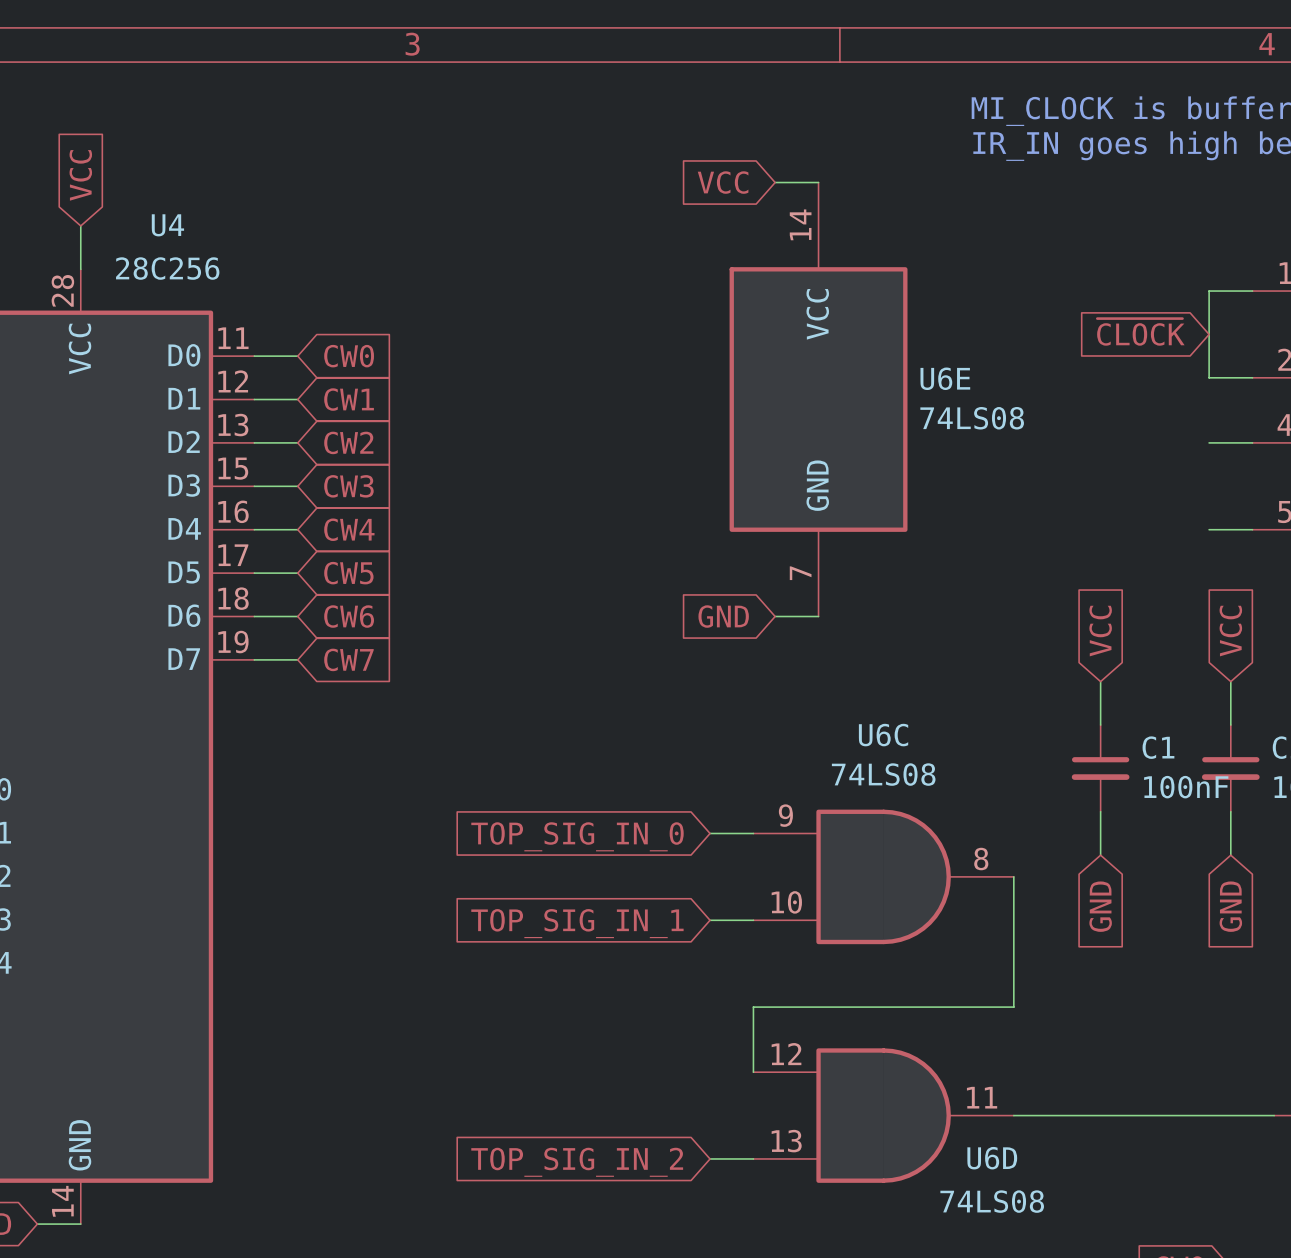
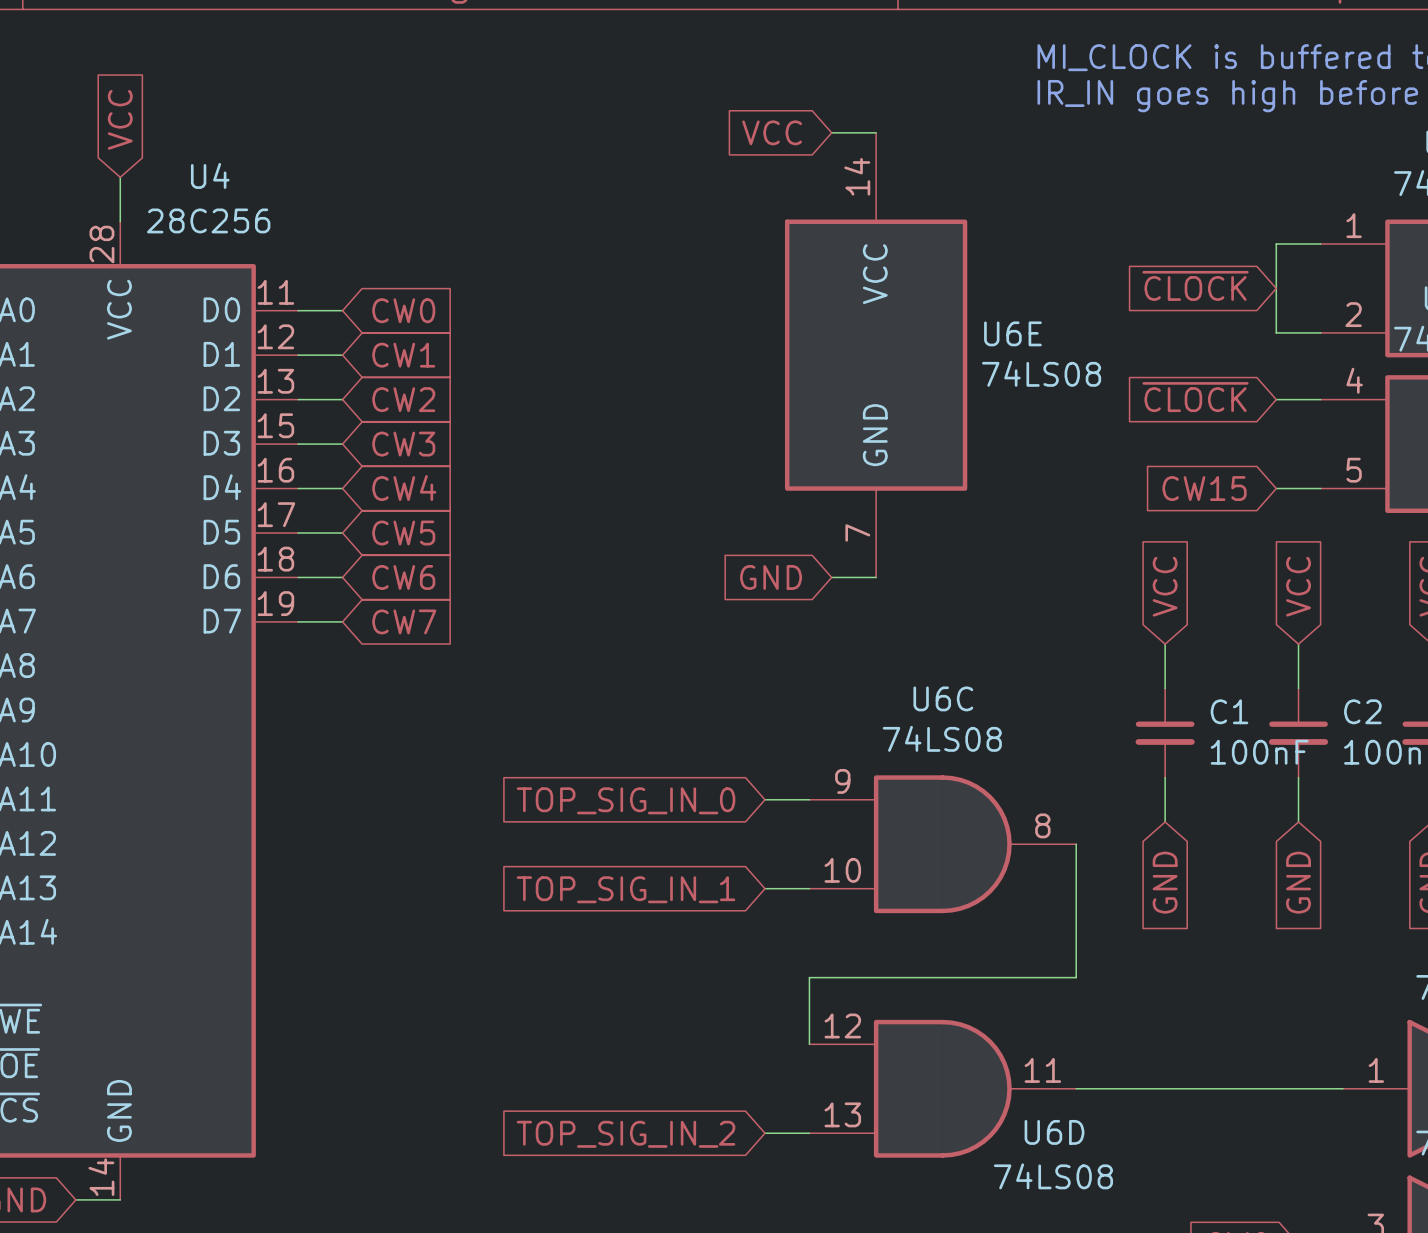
global label: none -> ~{CLOCK} (1195, 397)
global label: none -> CW15 (1204, 488)

